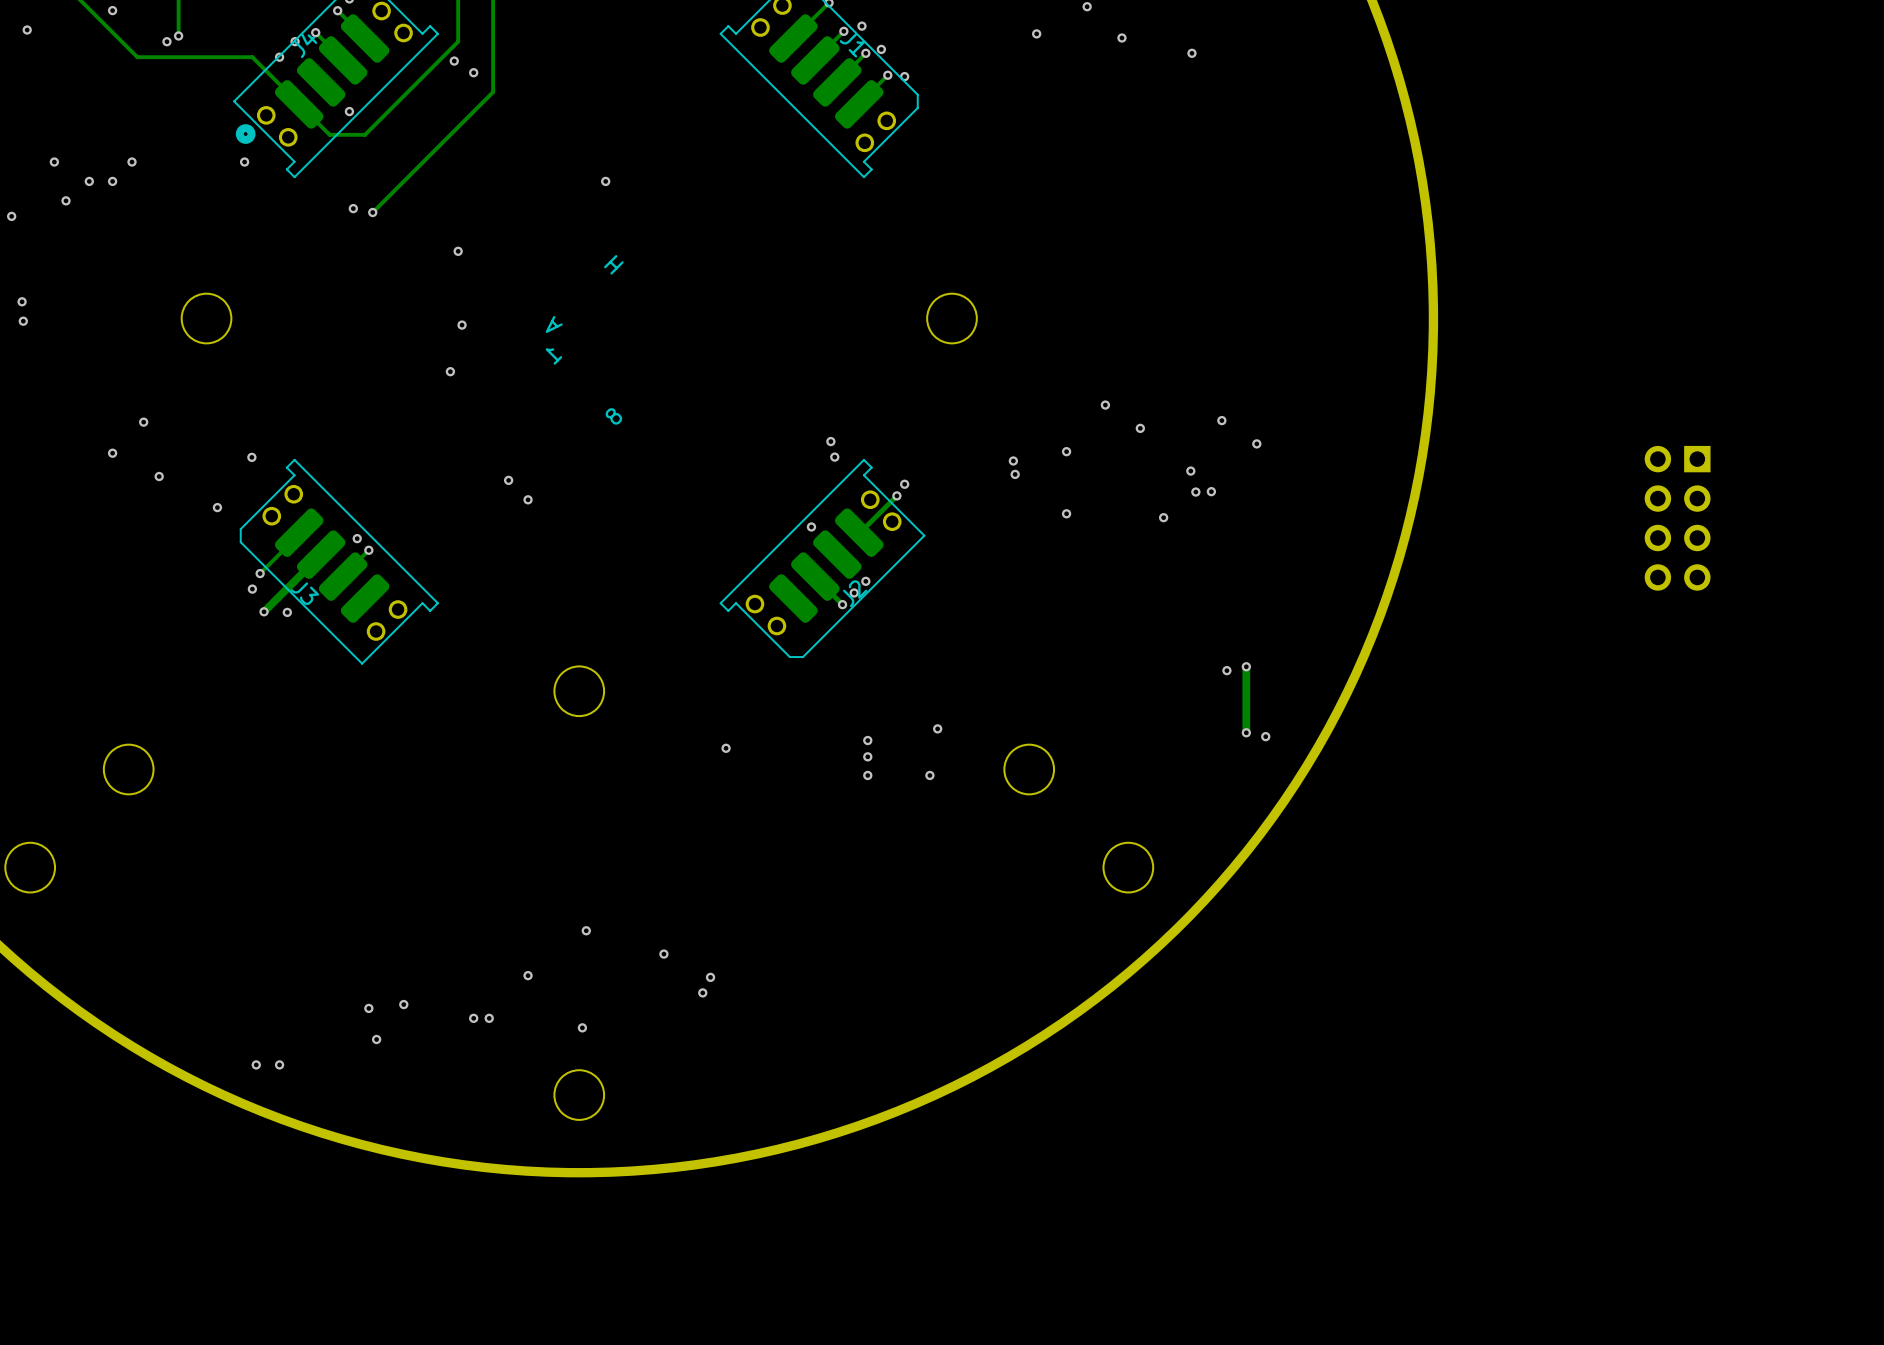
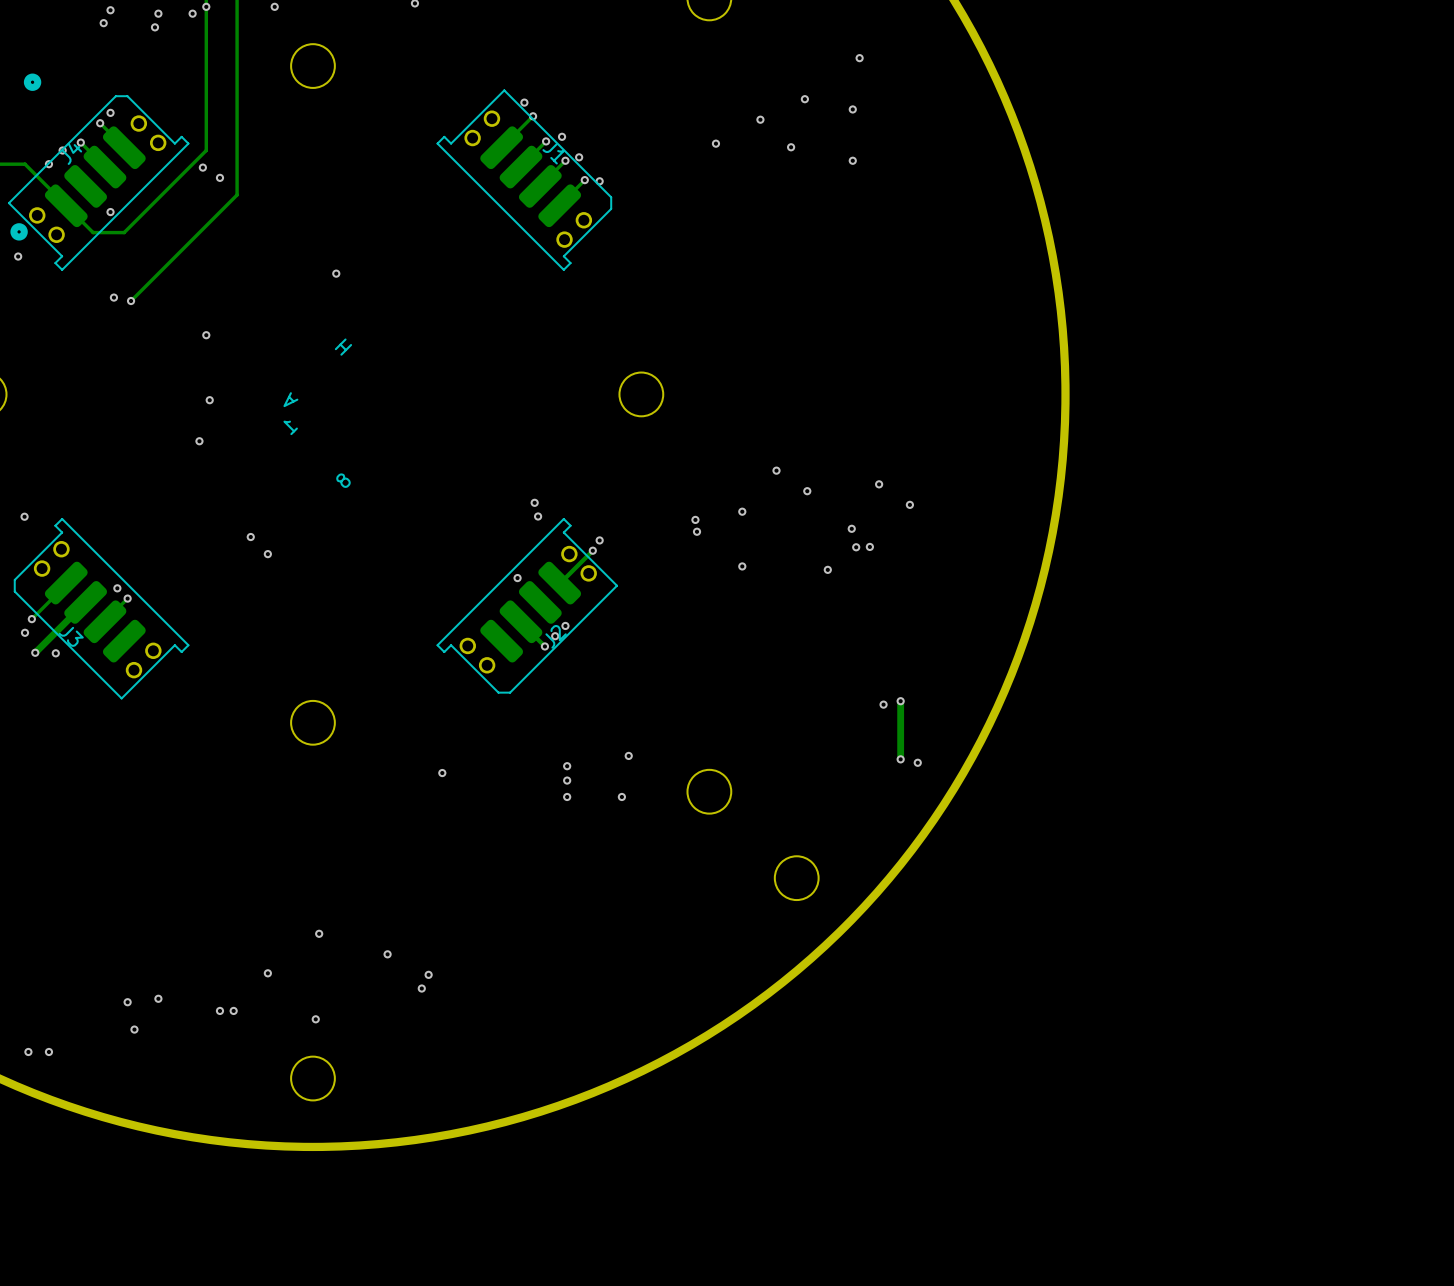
part: (1677, 518) -> none

